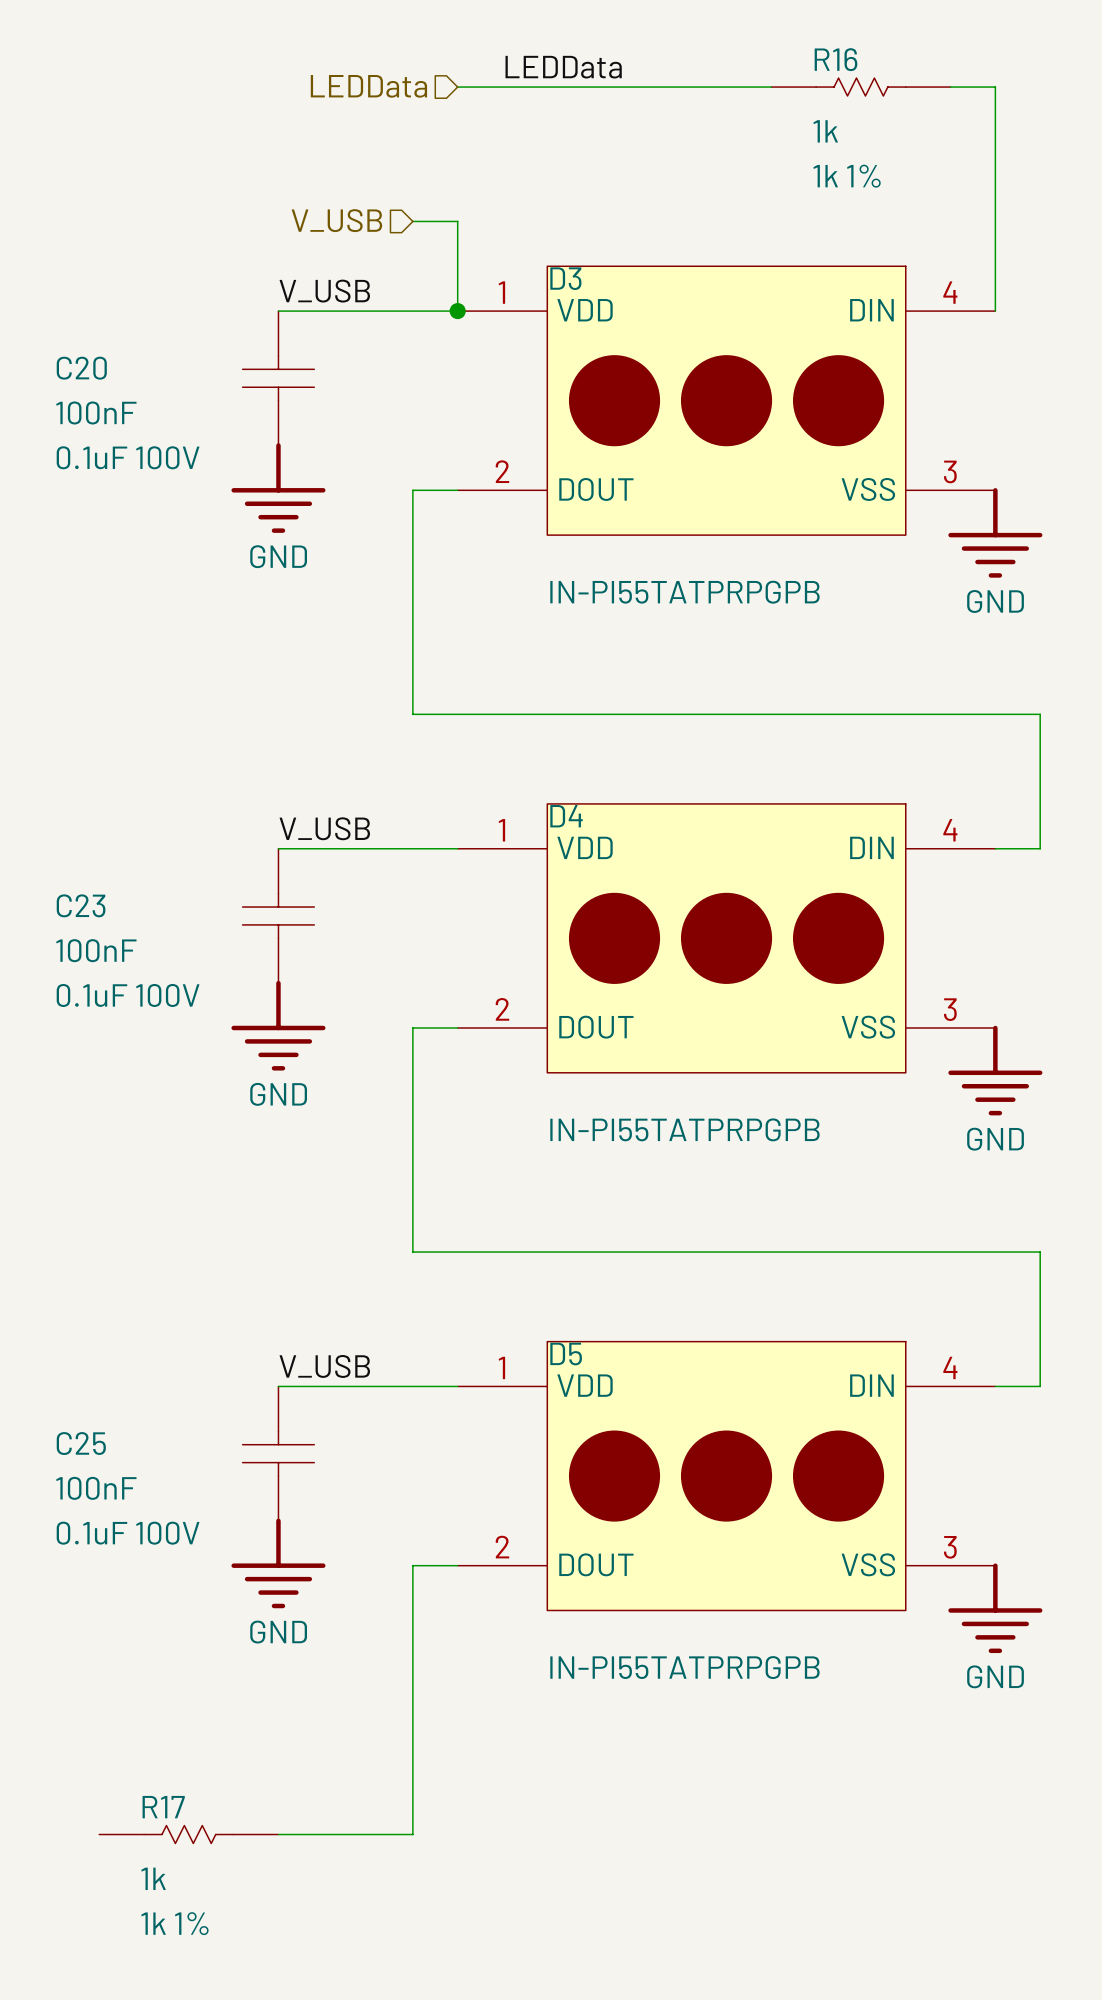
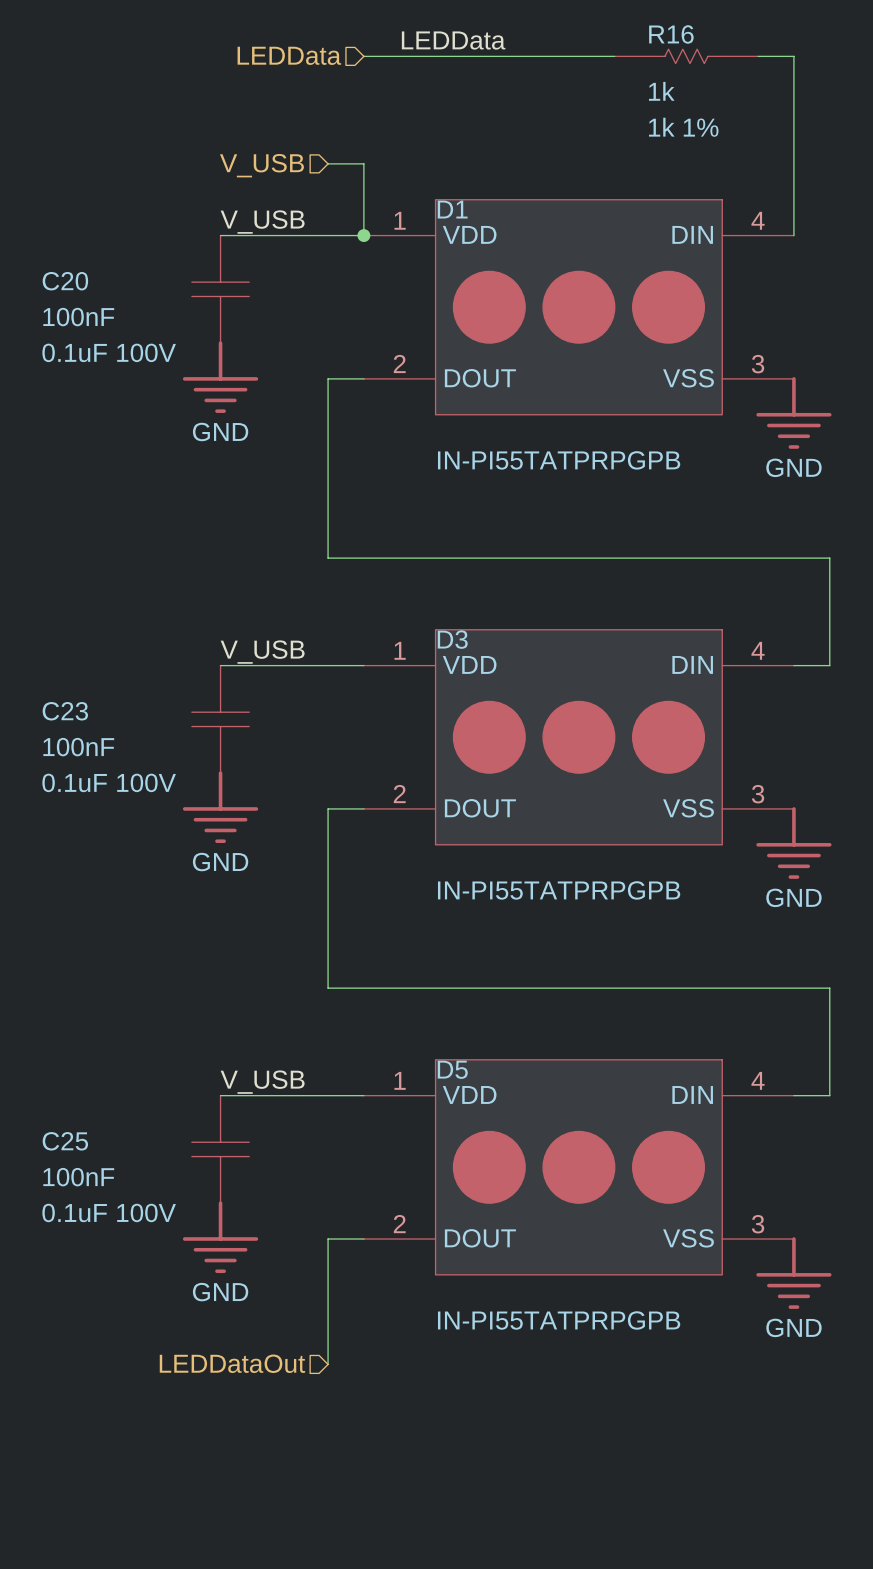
D3 name: D3 (565, 278) -> D1 (452, 209)
D4 name: D4 (566, 816) -> D3 (452, 639)
hierarchical label: none -> LEDDataOut (232, 1363)
wire: (412, 1722) (412, 1834) (278, 1834) -> none
R17: 1k (188, 1834) -> none

